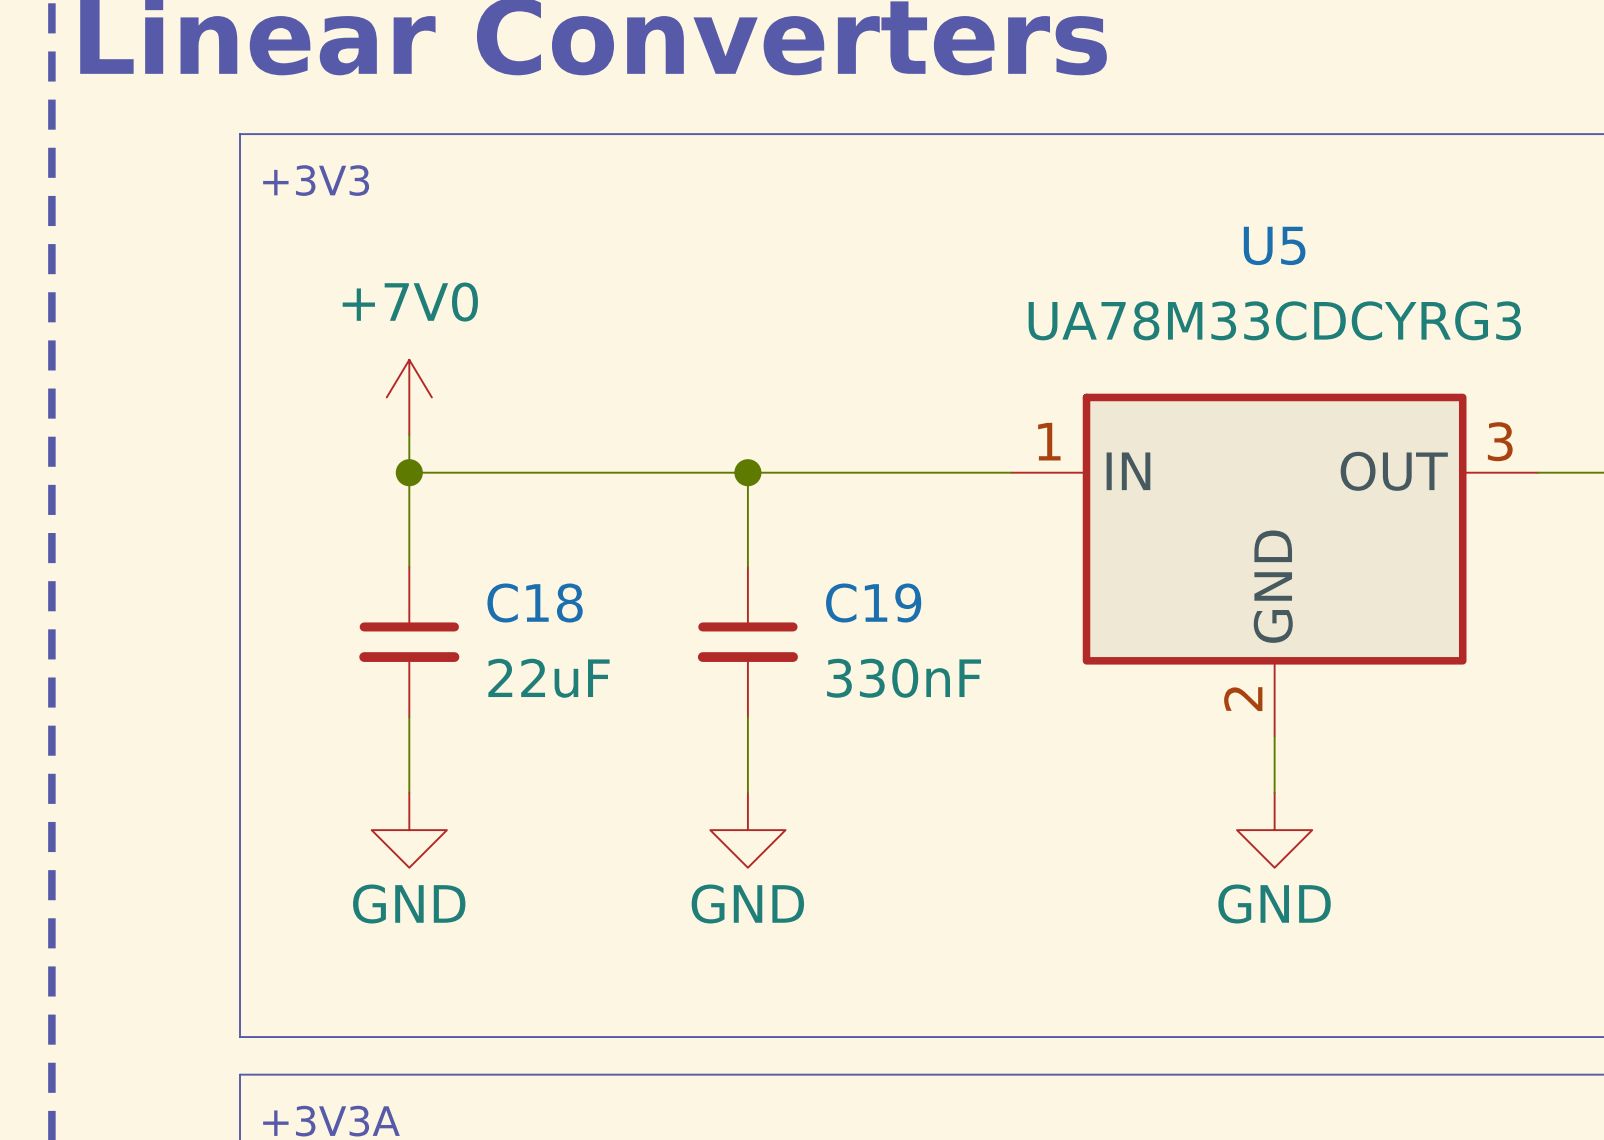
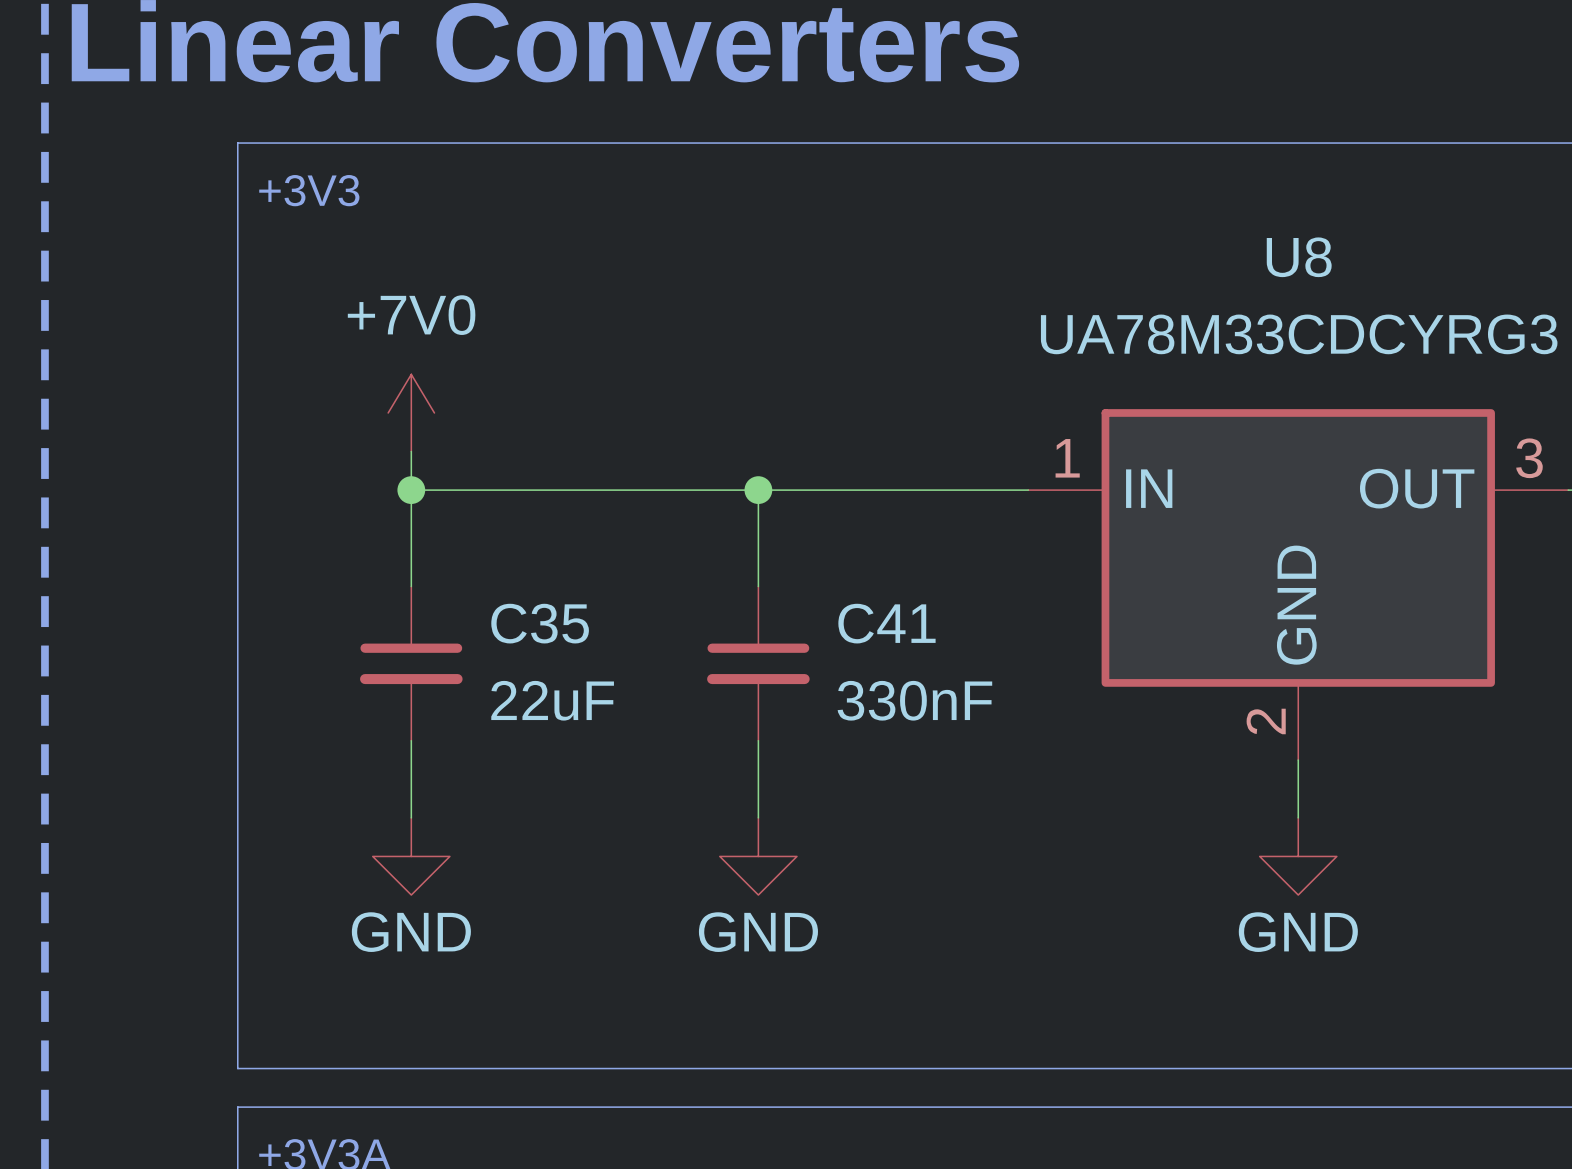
U5 name: U5 (1274, 245) -> U8 (1299, 257)
C18 name: C18 (535, 603) -> C35 (540, 623)
C19 name: C19 (873, 603) -> C41 (886, 623)

